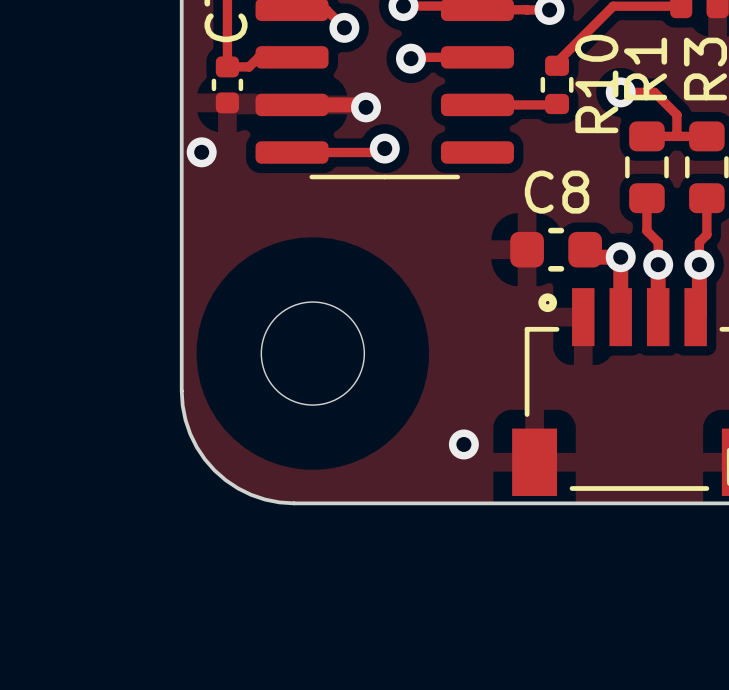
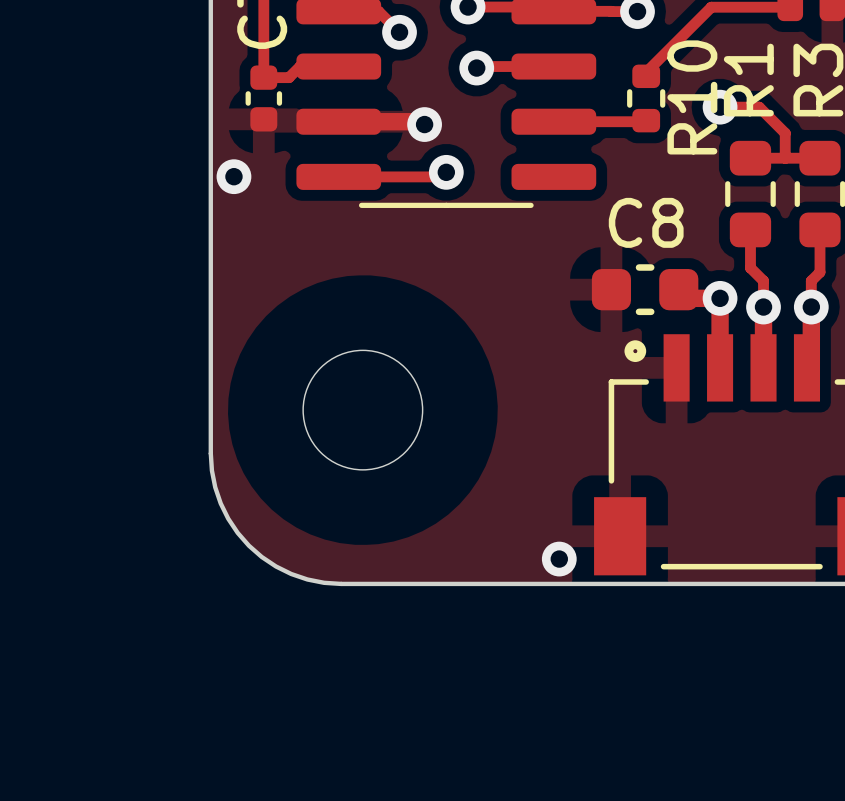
via position: (463, 444) -> (559, 559)

